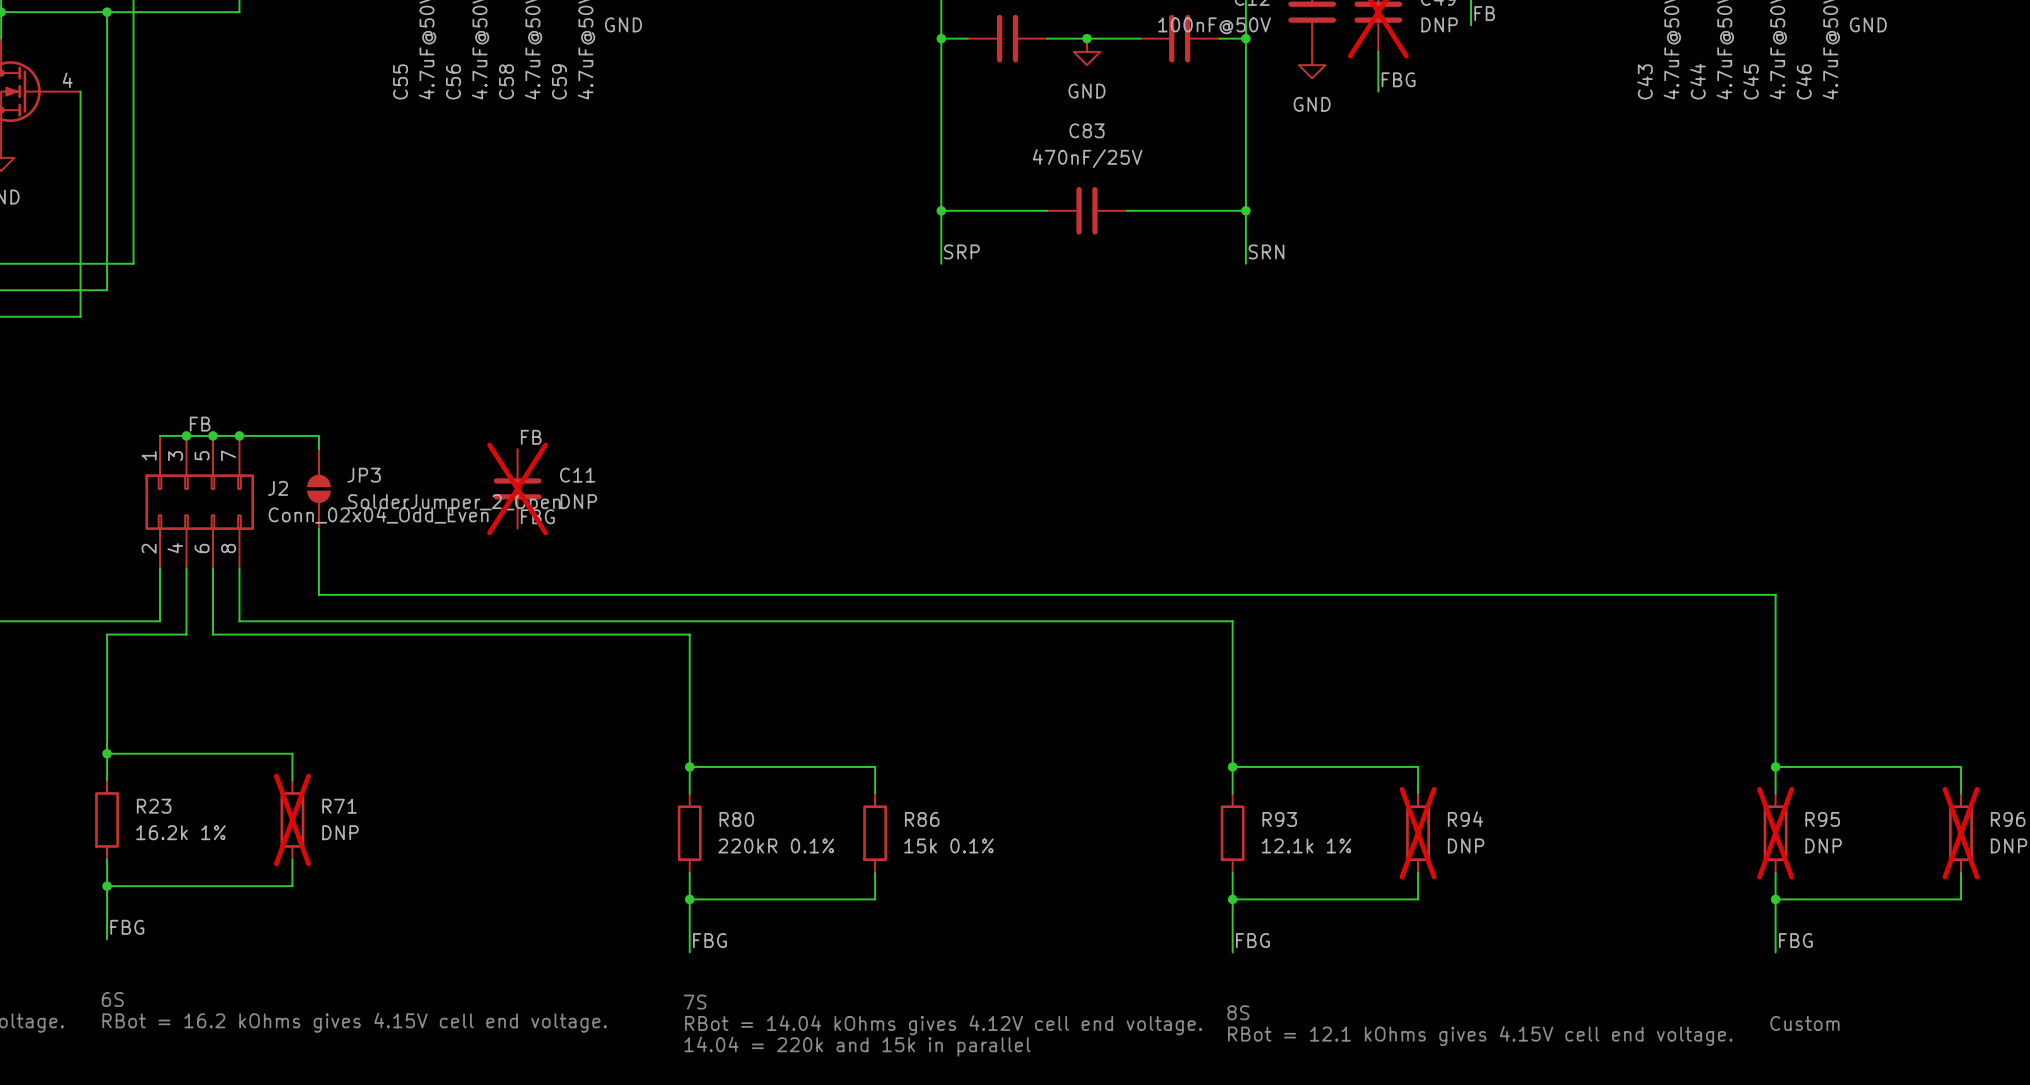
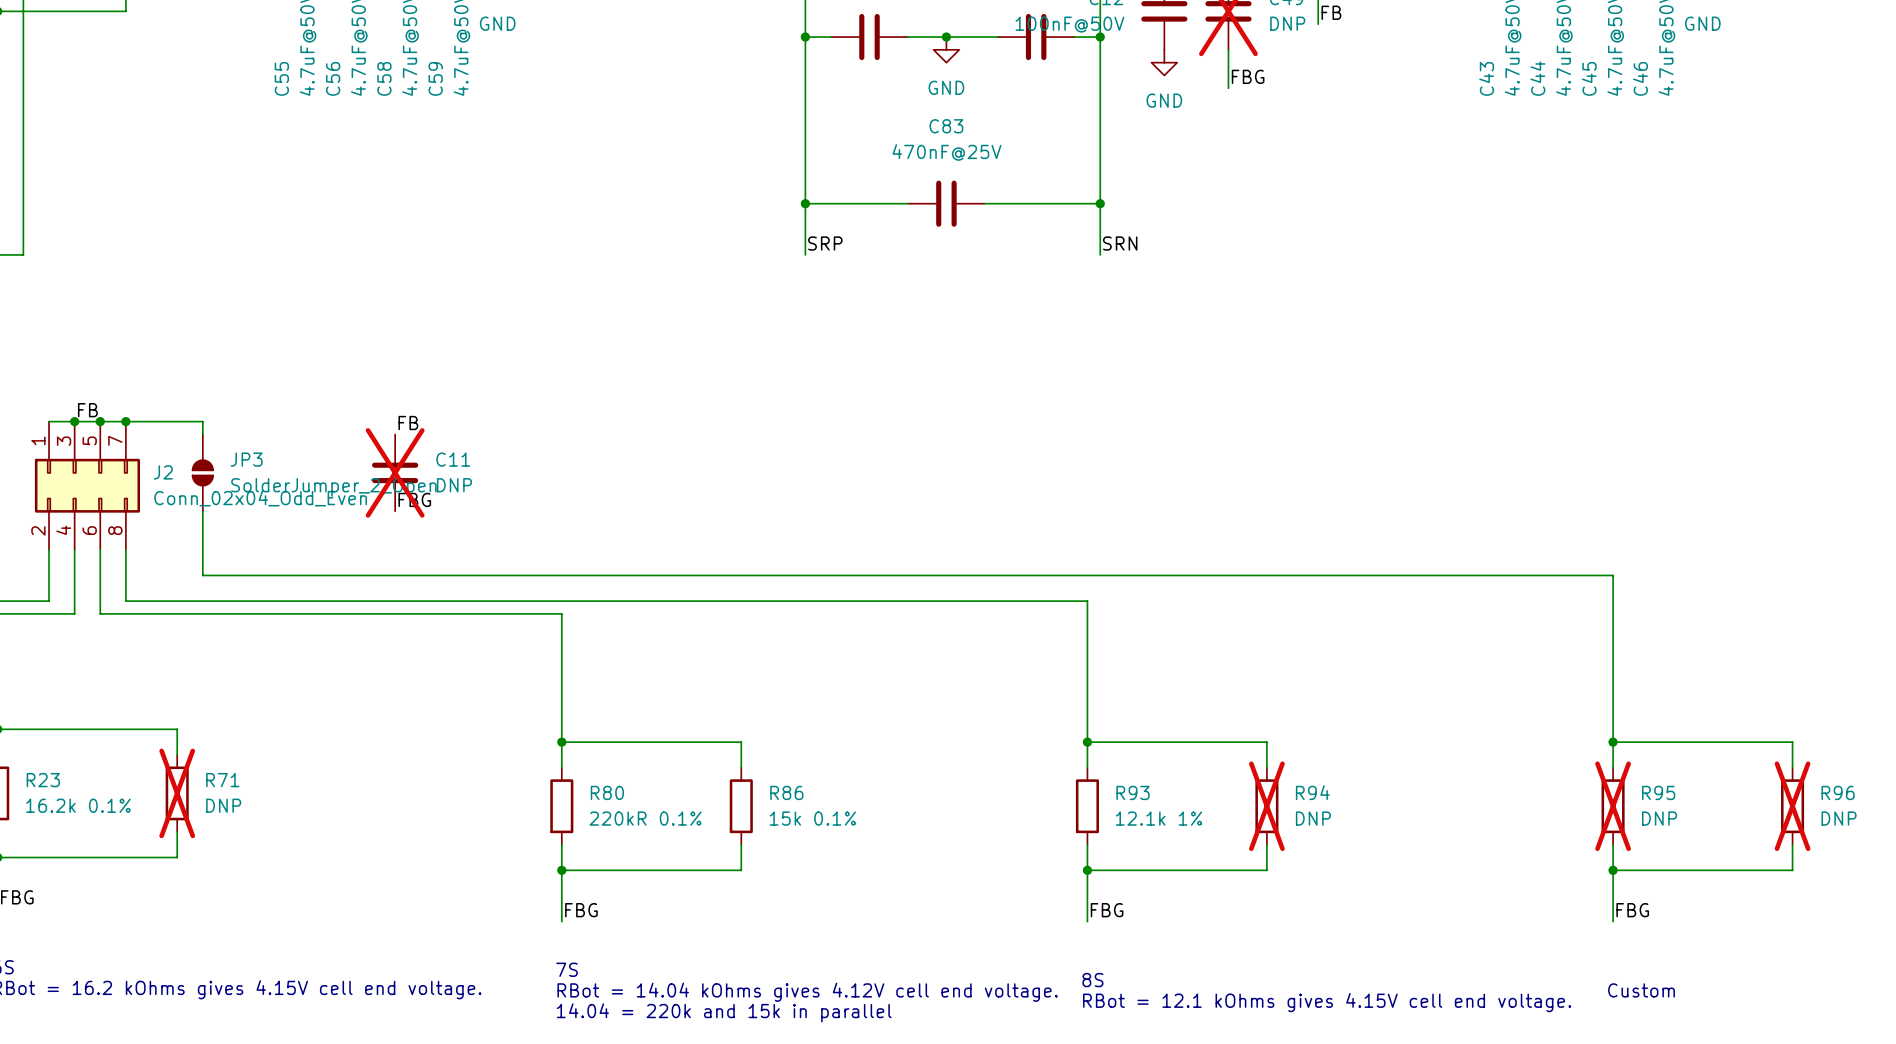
C83 value: 470nF/25V (1087, 158) -> 470nF@25V (947, 152)
R23 value: 16.2k 1% (180, 832) -> 16.2k 0.1% (78, 805)

